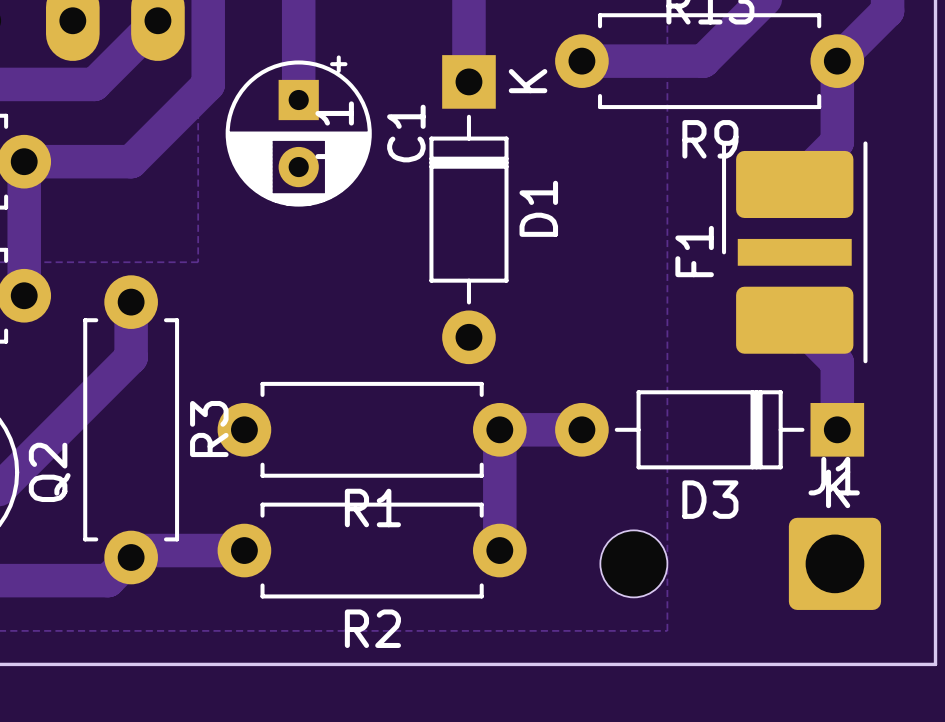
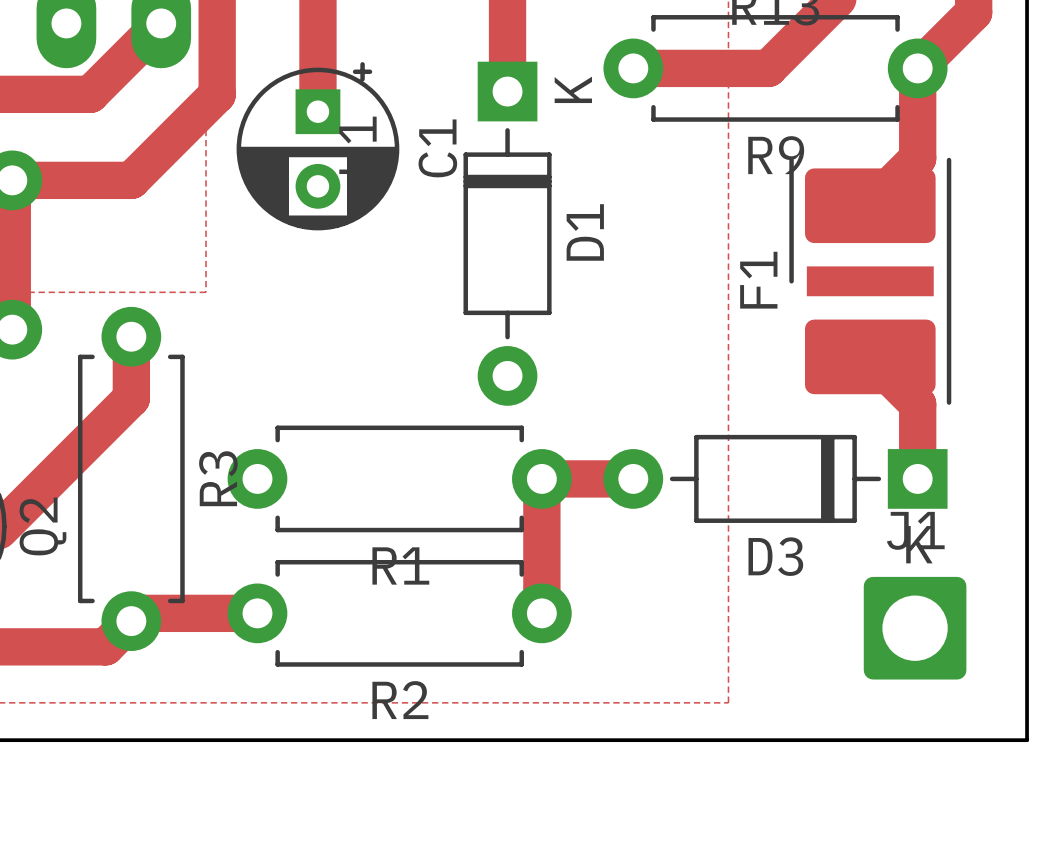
part: (633, 563) -> none

